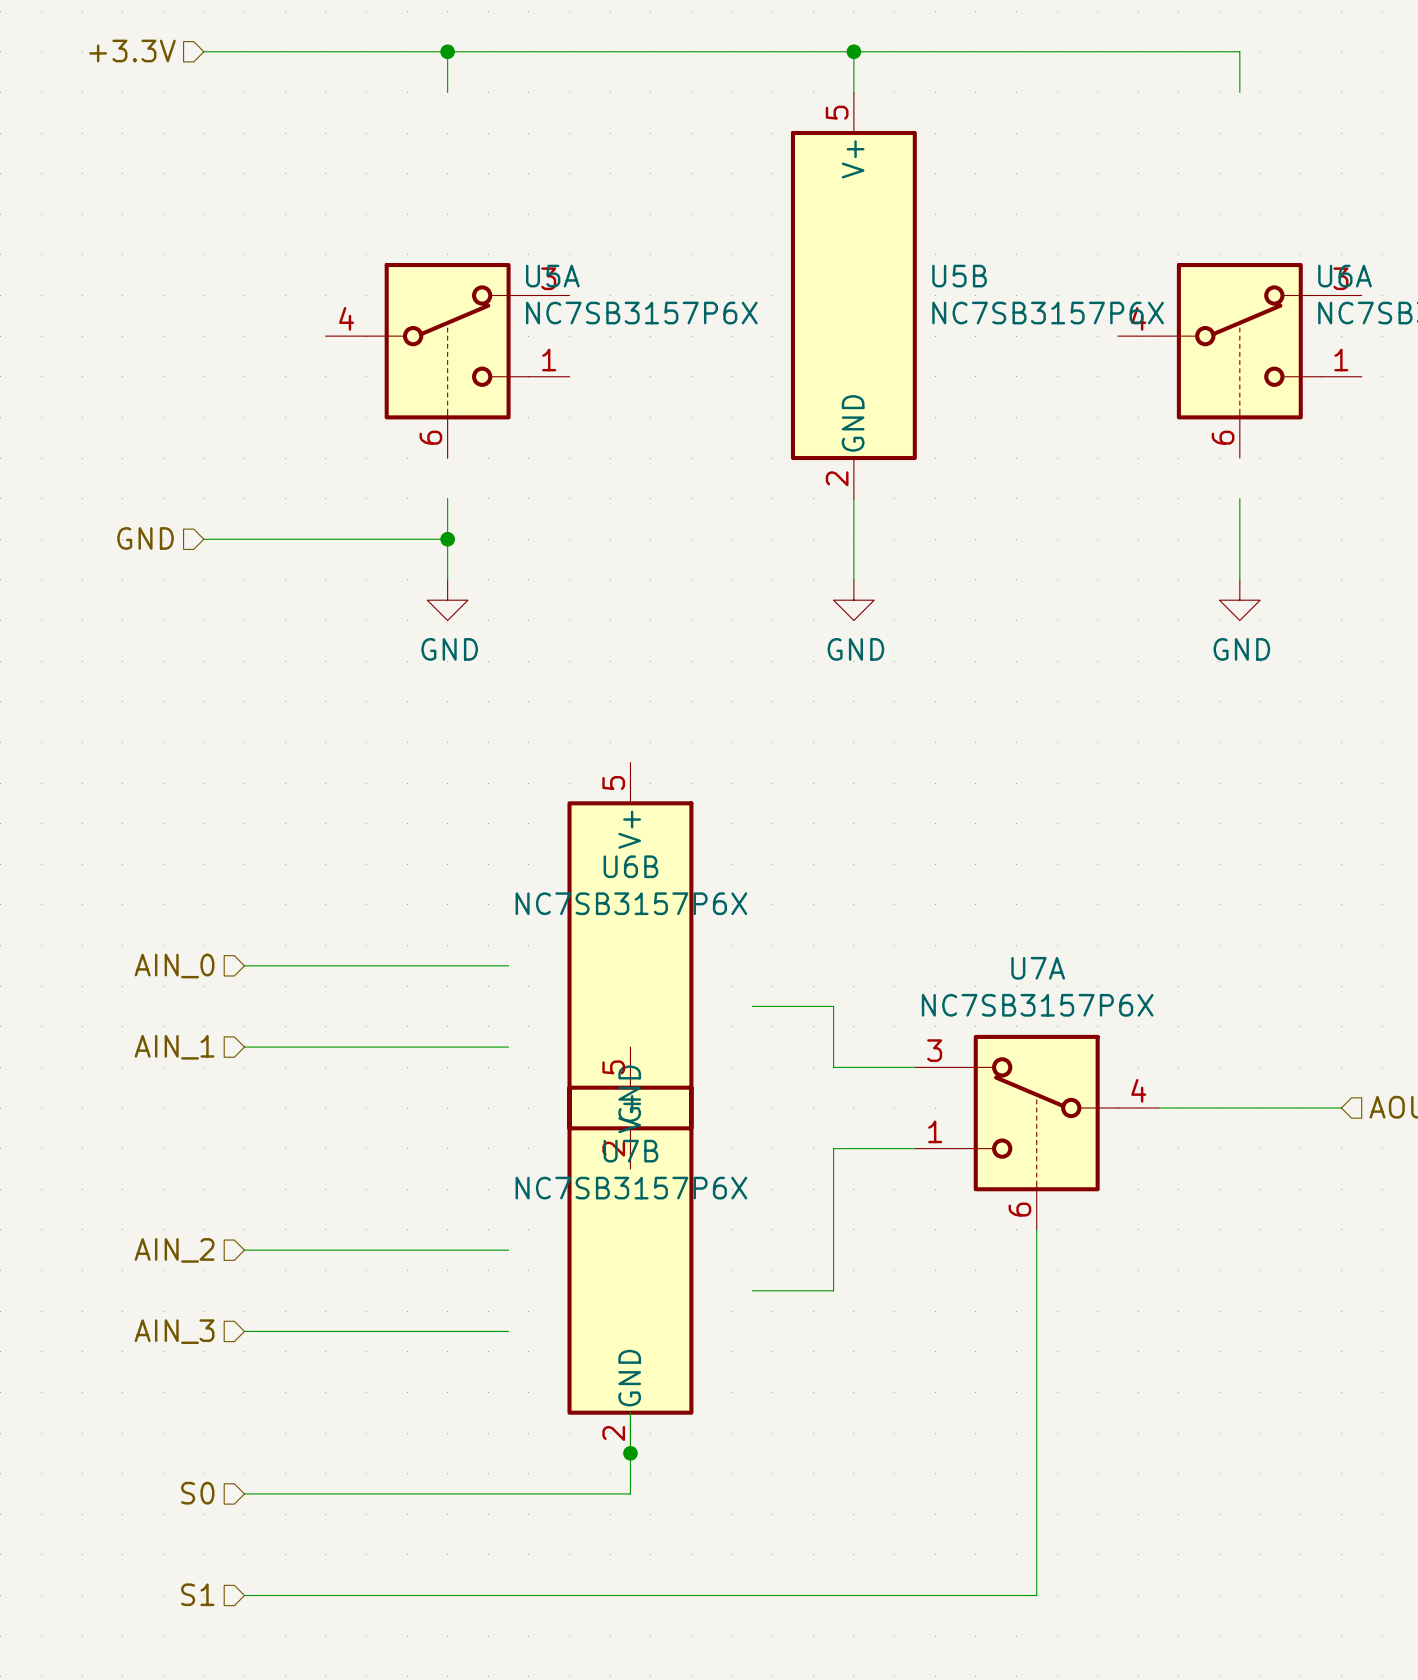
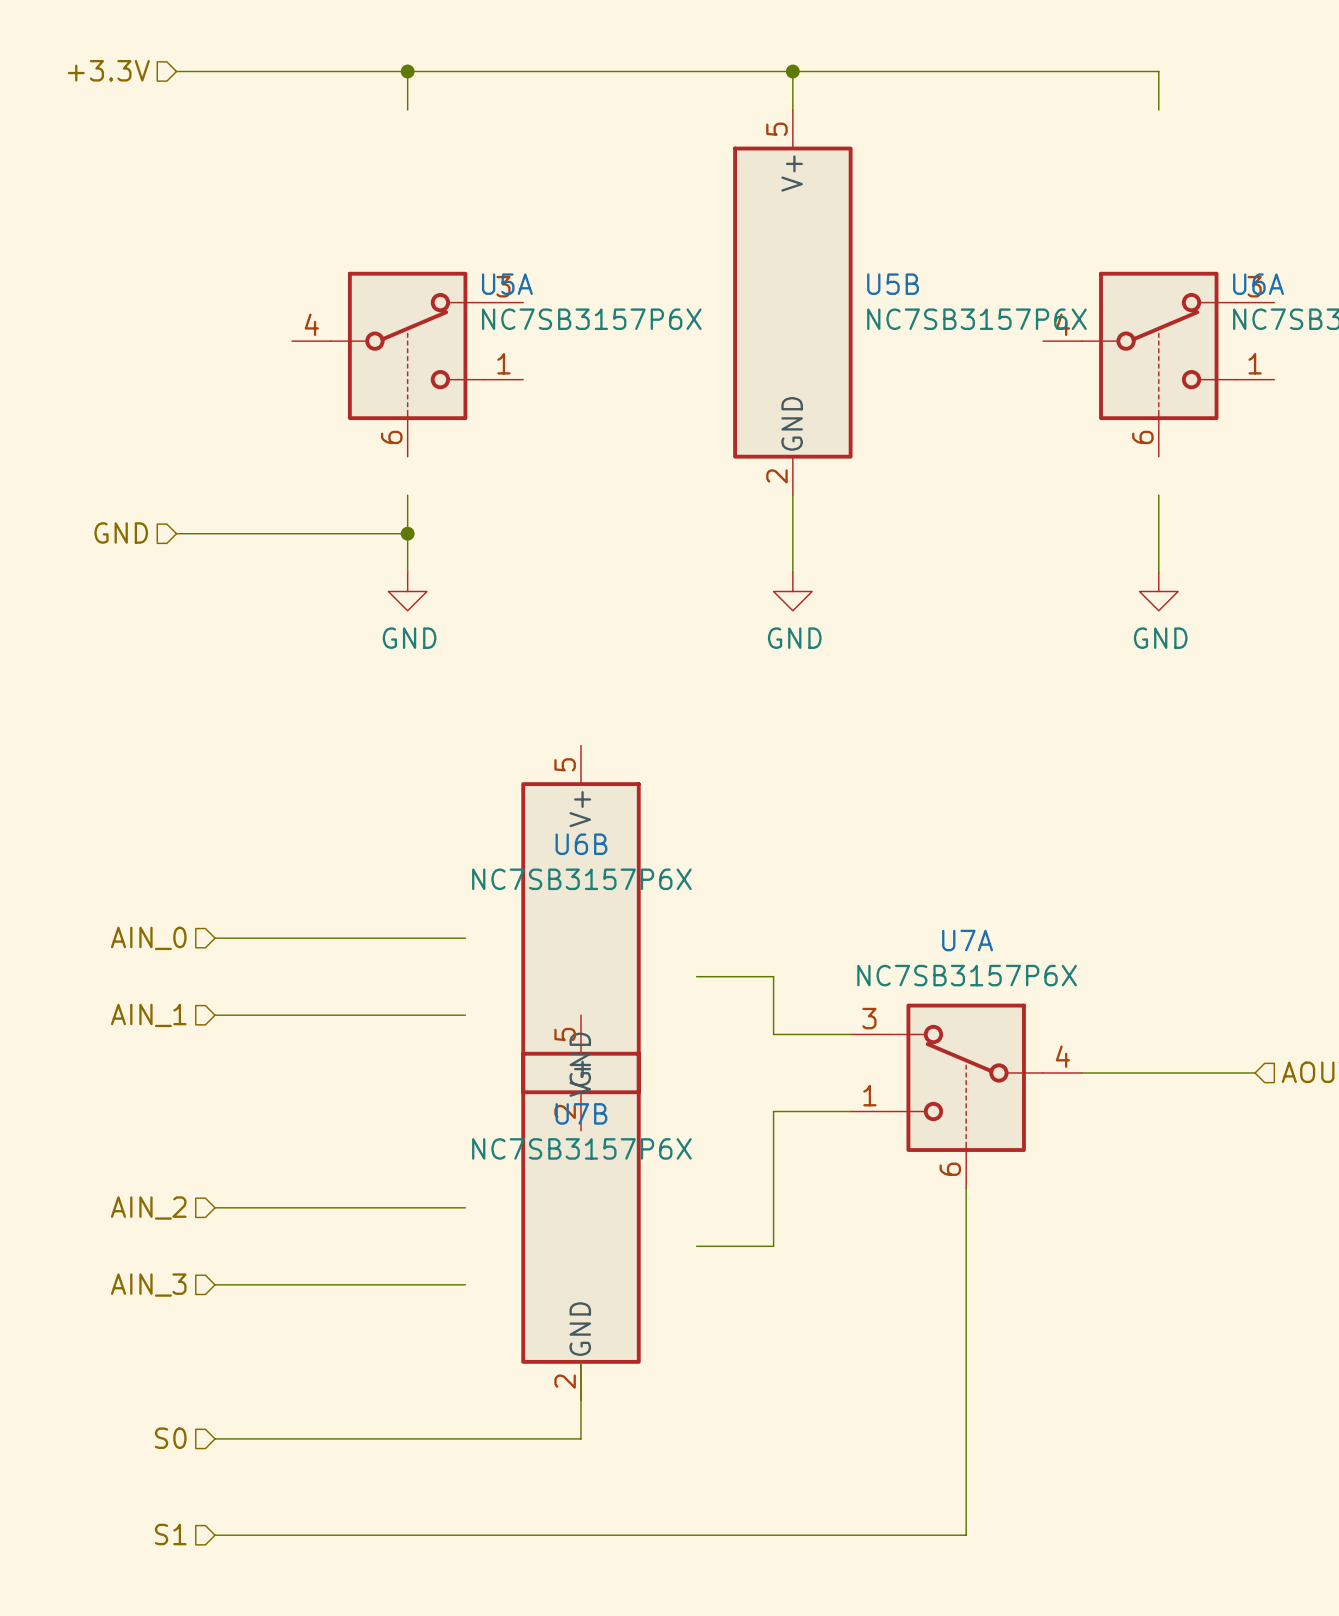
junction: (630, 1453) -> none

